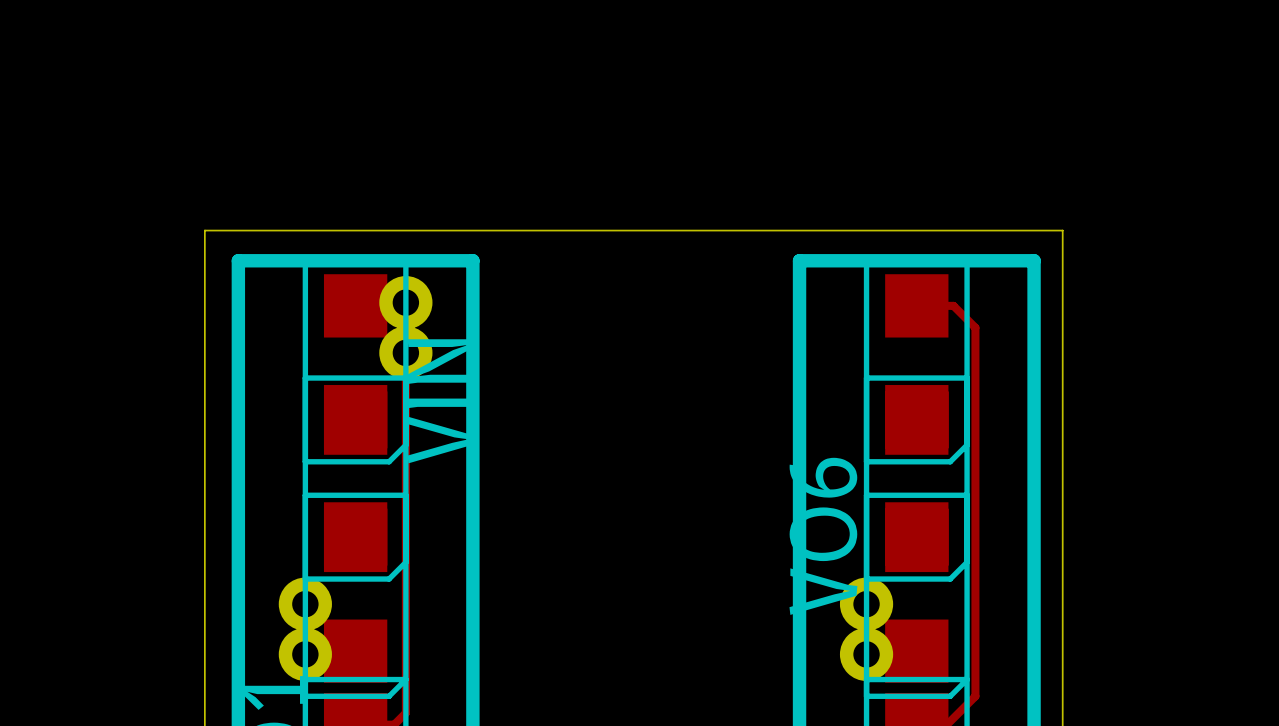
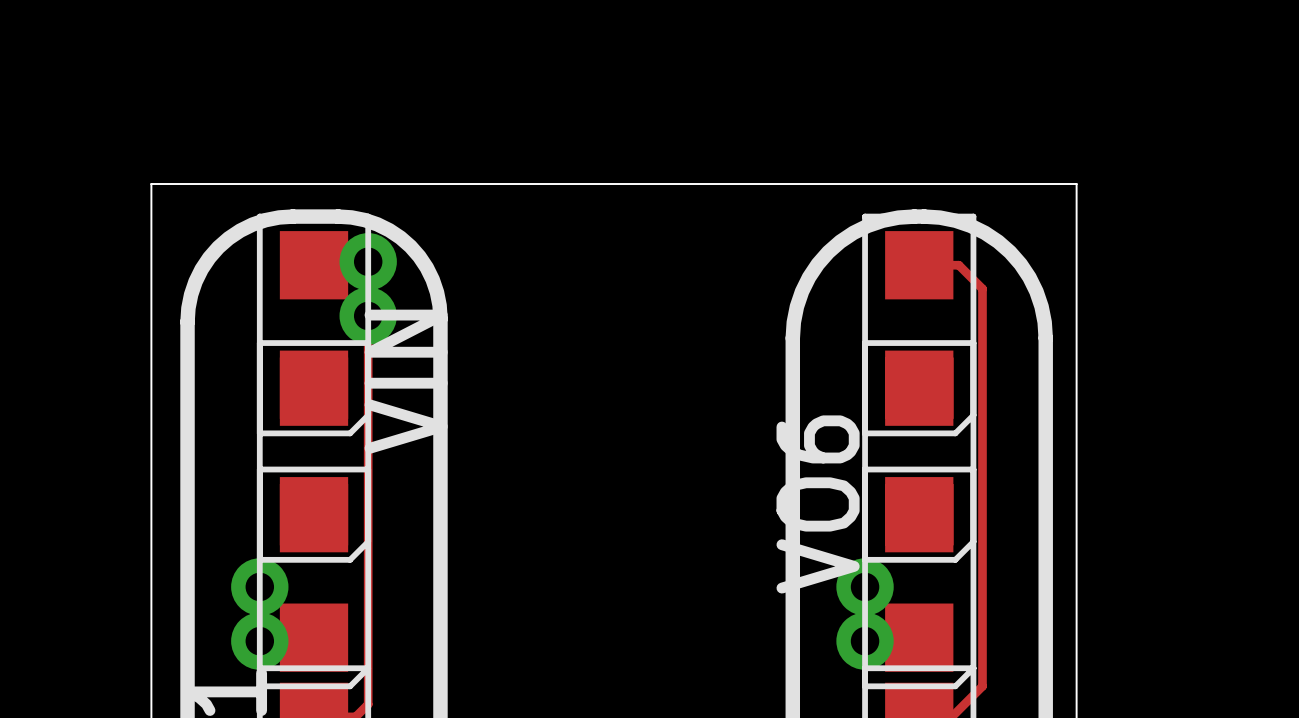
line: (336, 260) (238, 260) (238, 358) -> (292, 216) (279, 217) (252, 224) (240, 230) (218, 247) (201, 269) (195, 281) (188, 308) (187, 321)
line: (378, 260) (472, 260) (472, 355) -> (338, 216) (364, 220) (377, 224) (400, 237) (410, 246) (419, 256) (432, 279) (436, 292) (440, 318)
line: (912, 260) (799, 260) (799, 373) -> (914, 216) (882, 220) (867, 225) (840, 241) (828, 252) (817, 264) (802, 291) (793, 322) (792, 338)
line: (921, 260) (1034, 260) (1034, 373) -> (924, 216) (955, 220) (970, 225) (998, 241) (1010, 252) (1020, 264) (1036, 291) (1041, 306) (1045, 338)

